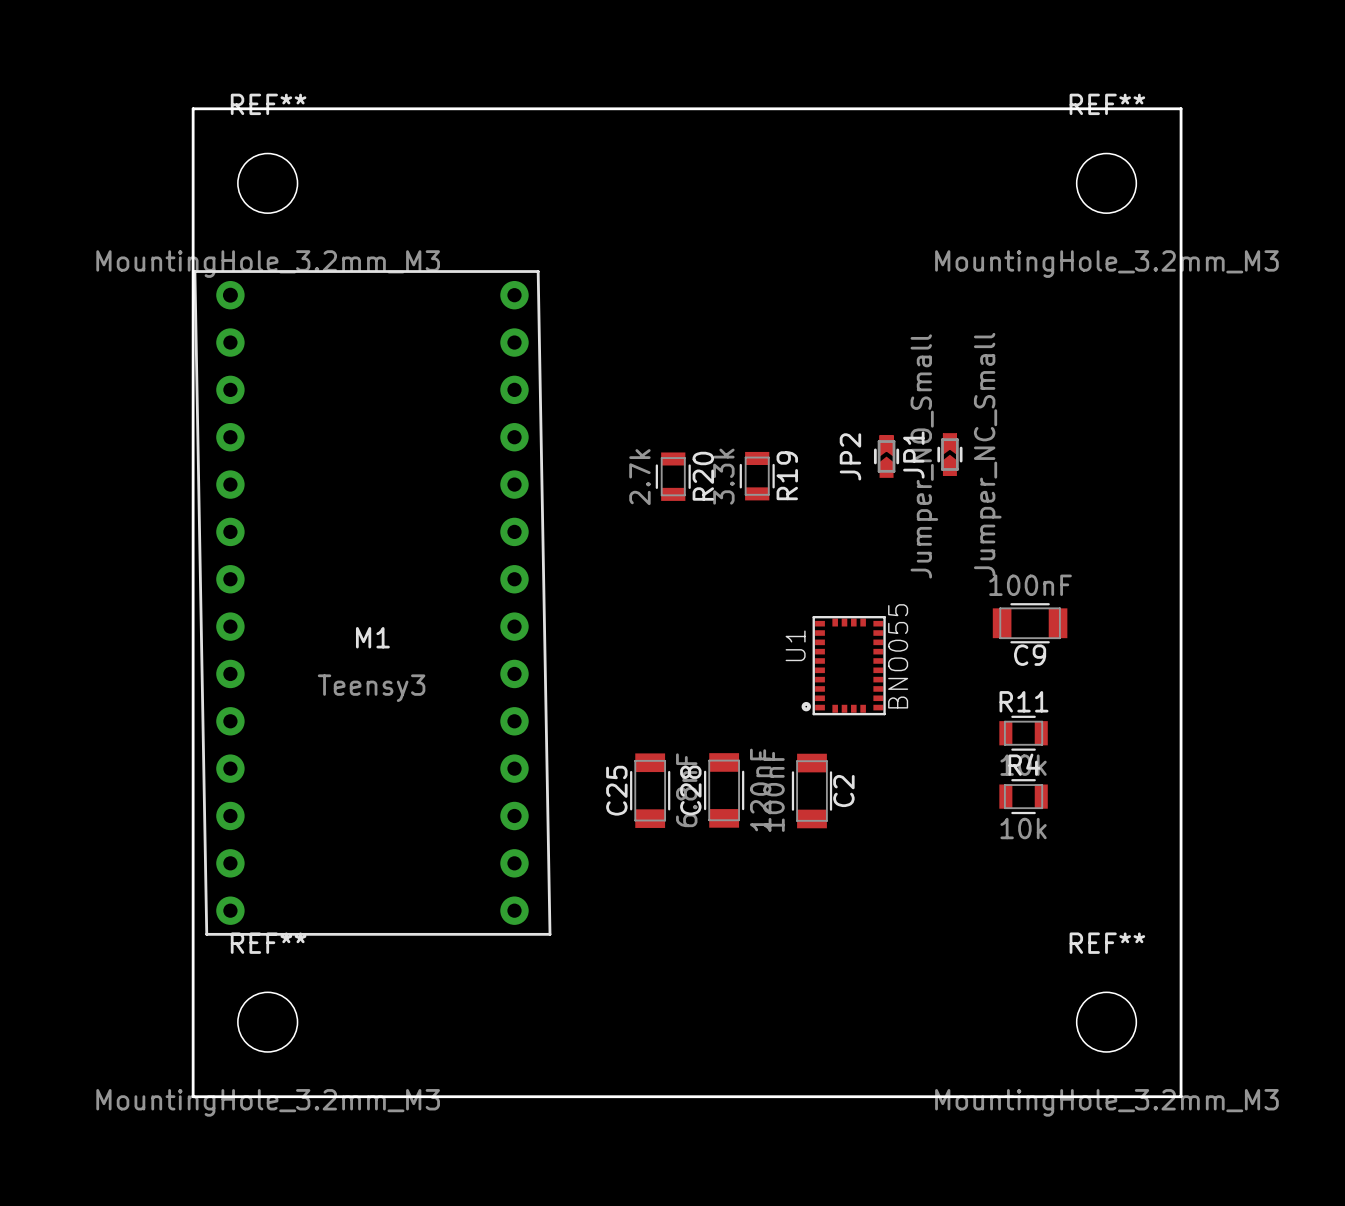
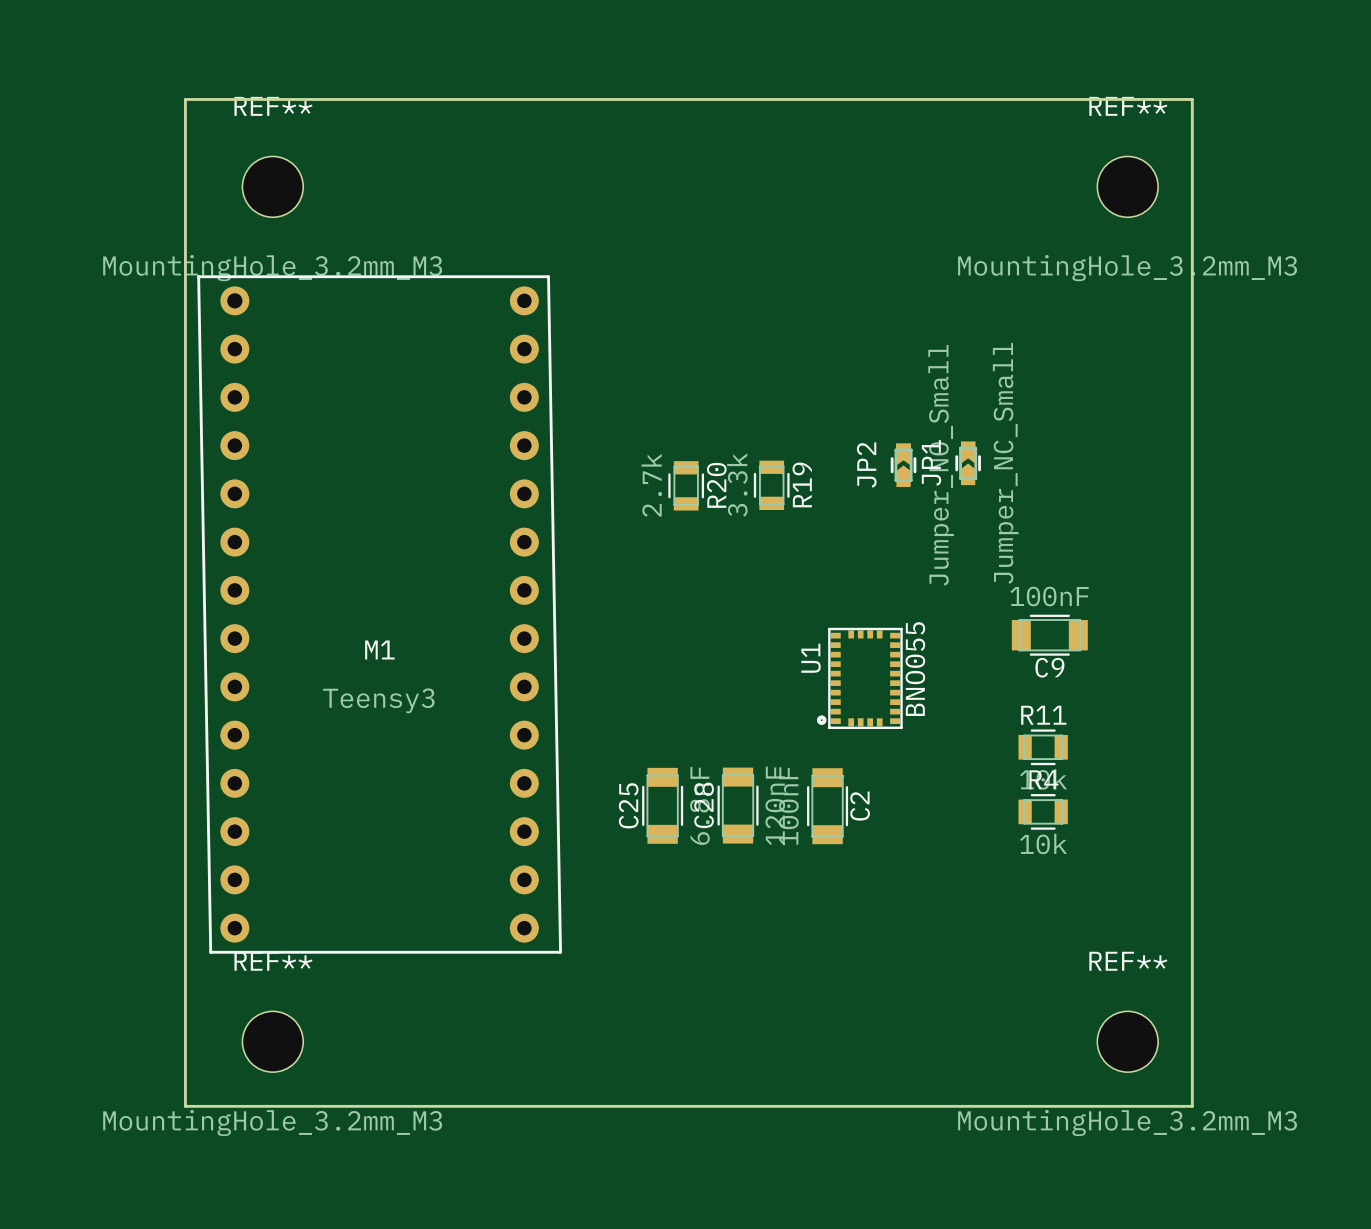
board edge: (193, 108) (193, 1096) (1181, 1096) (1181, 108) (193, 108) -> (185, 99) (185, 1106) (1192, 1106) (1192, 99) (185, 99)

